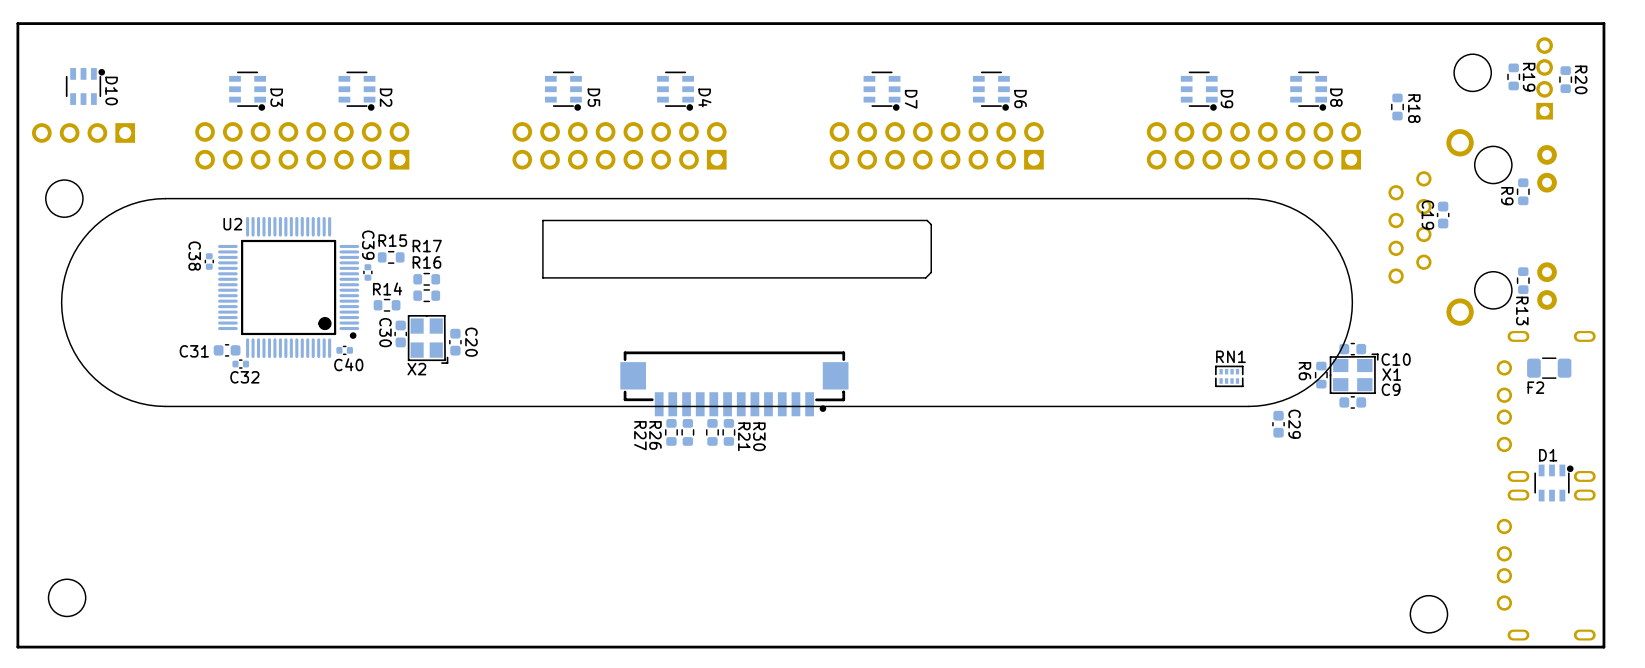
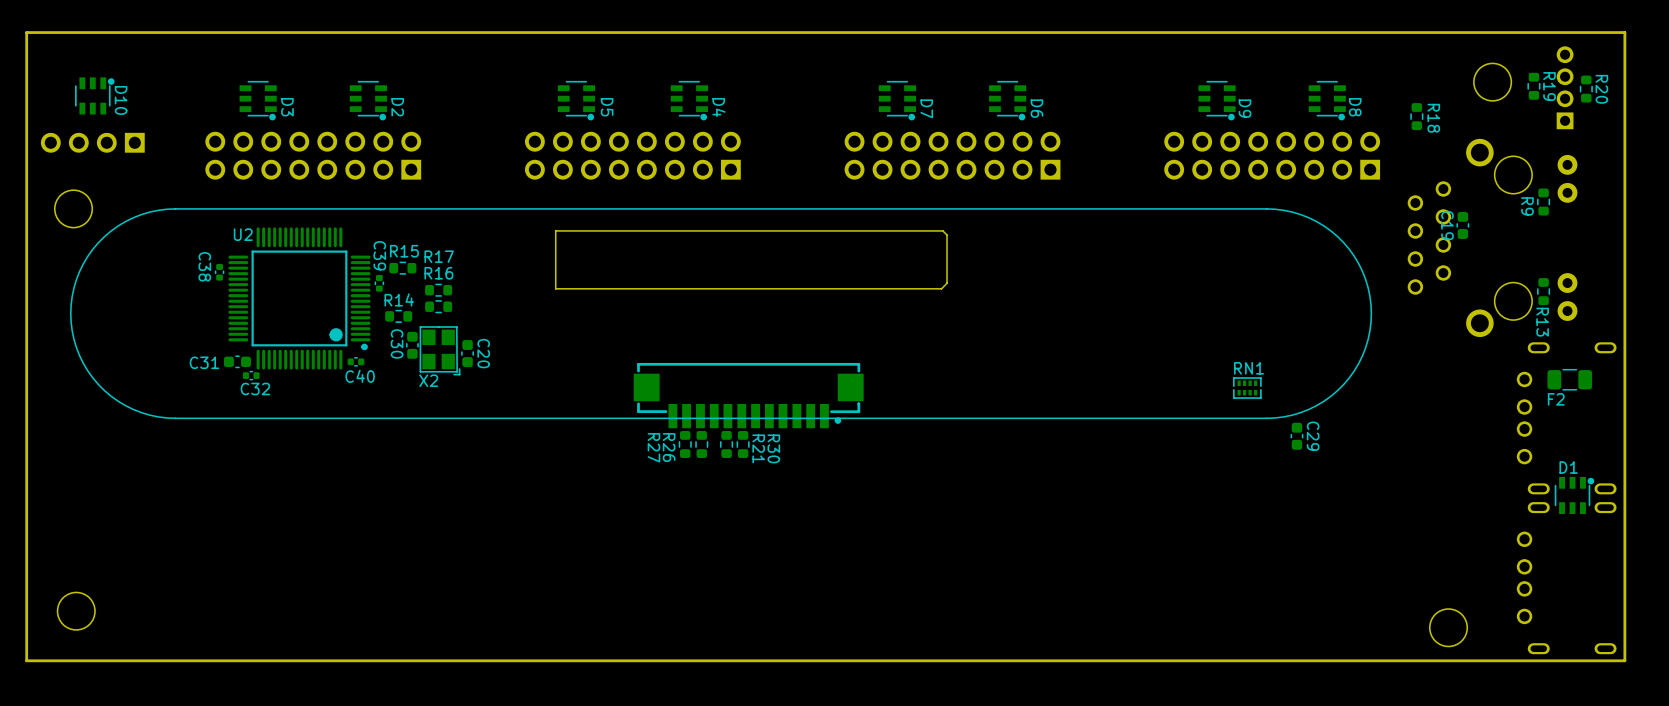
C10: (1352, 349) -> none
X1: (1354, 373) -> none
R6: (1321, 375) -> none
C9: (1352, 402) -> none

